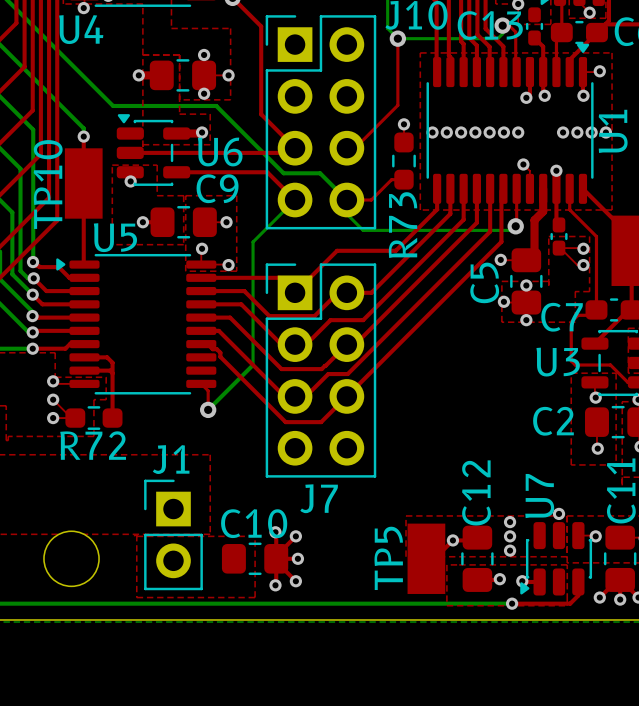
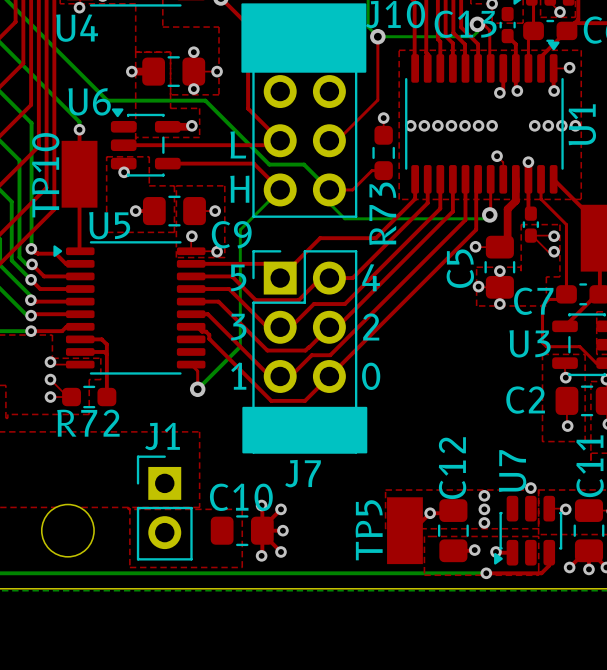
drawing: none -> [241, 3, 367, 73]
U6 name position: U6 (220, 151) -> U6 (89, 101)
text: none -> L (238, 144)
C9 name position: C9 (217, 188) -> C9 (231, 234)
text: none -> H (239, 189)
text: none -> 5 (238, 277)
text: none -> 4 (371, 277)
text: none -> 3 (238, 327)
text: none -> 2 (371, 326)
text: none -> 1 (238, 376)
text: none -> 0 (371, 376)
drawing: none -> [242, 406, 368, 454]

